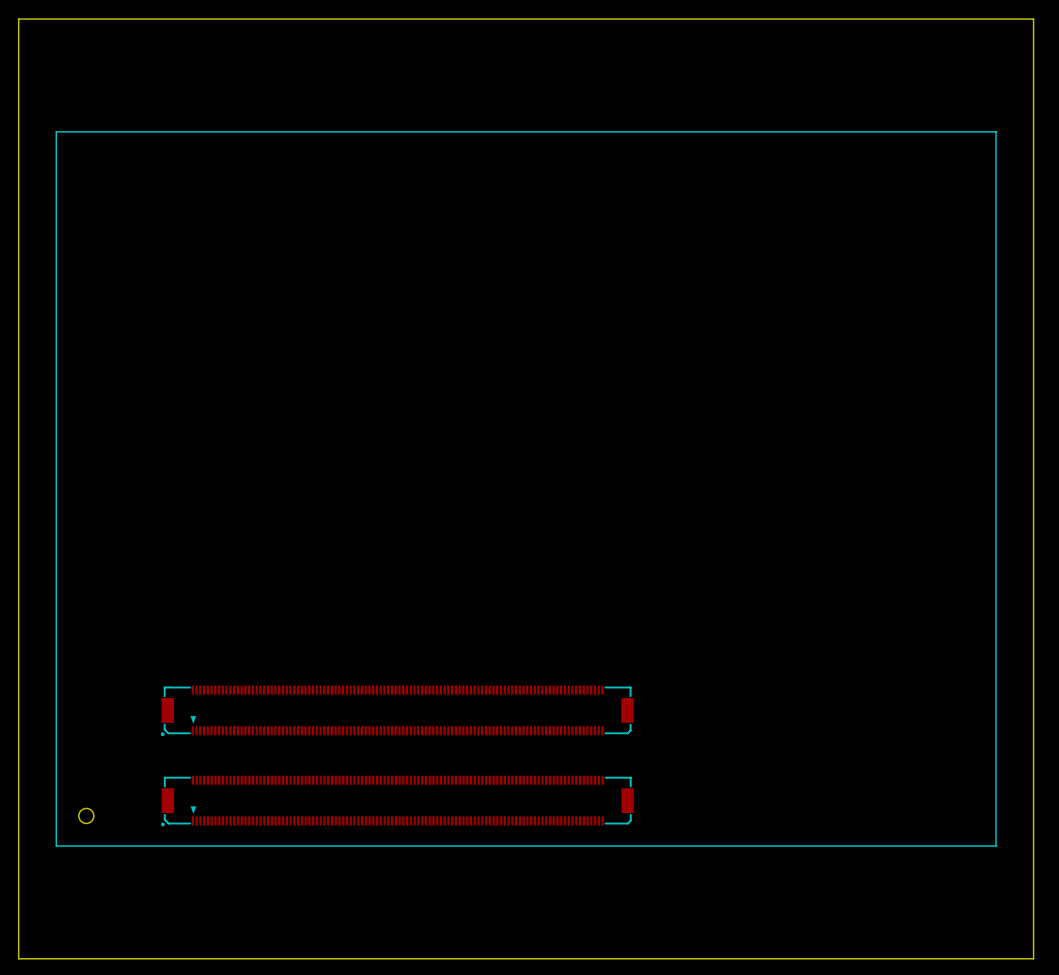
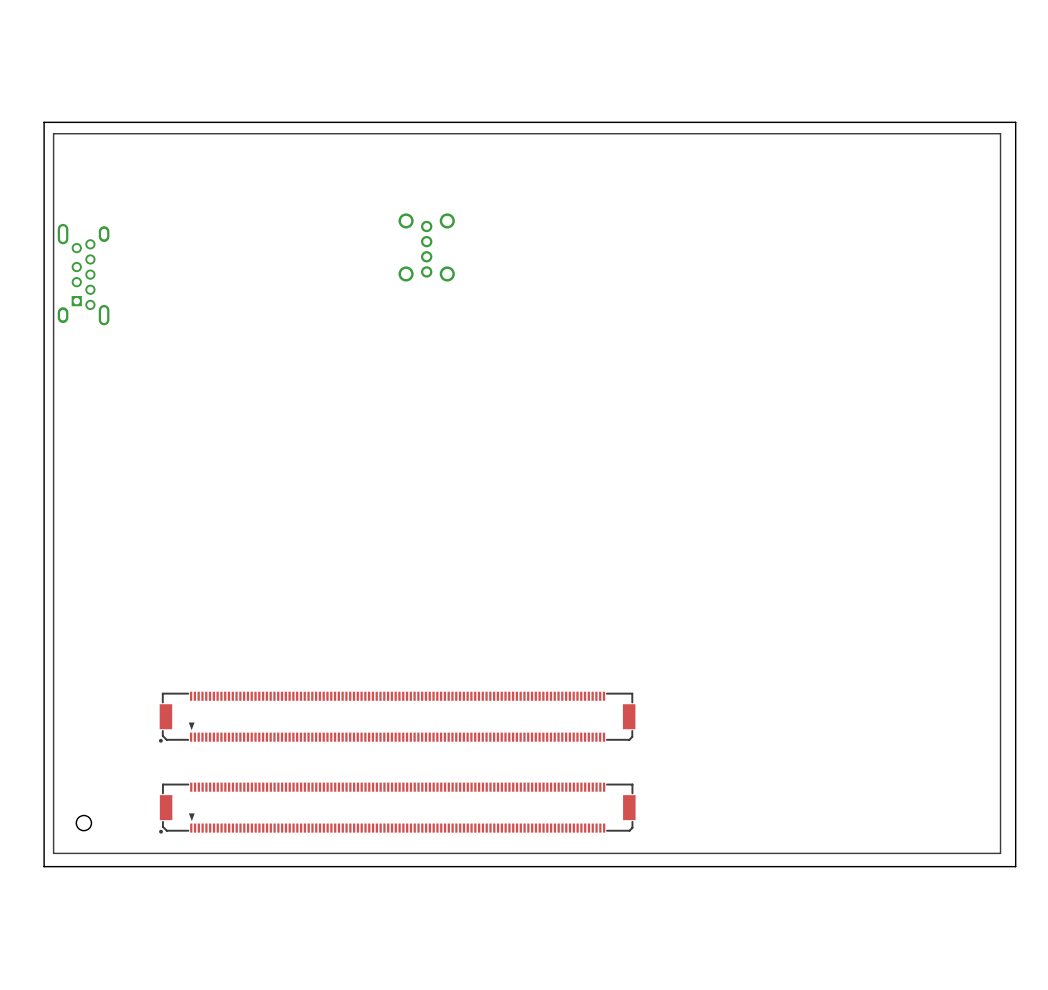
board edge: (18, 19) (1033, 19) (1033, 958) (18, 958) (18, 19) -> (44, 122) (44, 866) (1015, 866) (1015, 122) (44, 122)
part: none -> (426, 247)
part: none -> (83, 274)

